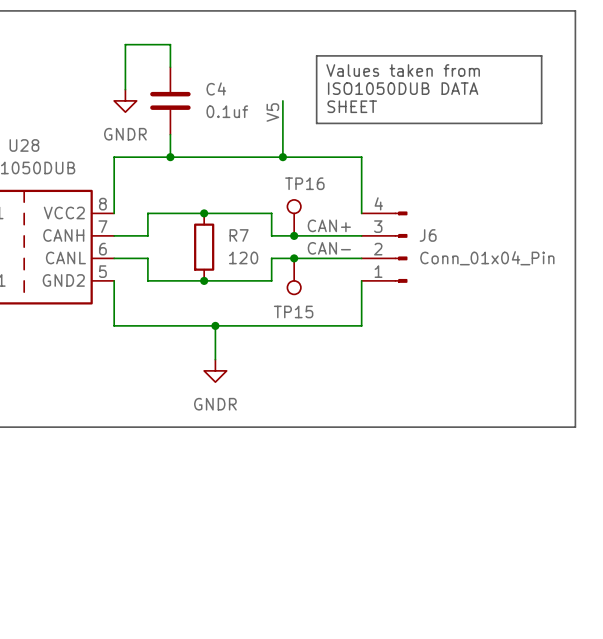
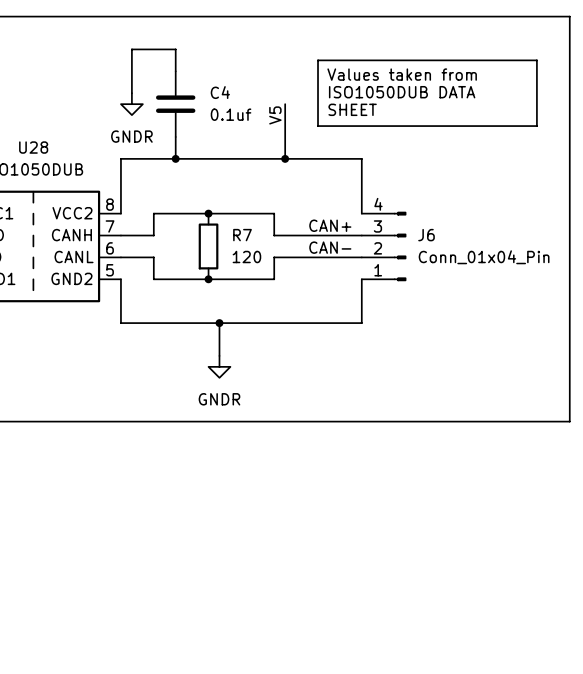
TP16: (294, 217) -> none
junction: (294, 235) -> none
junction: (294, 258) -> none
TP15: (294, 276) -> none

